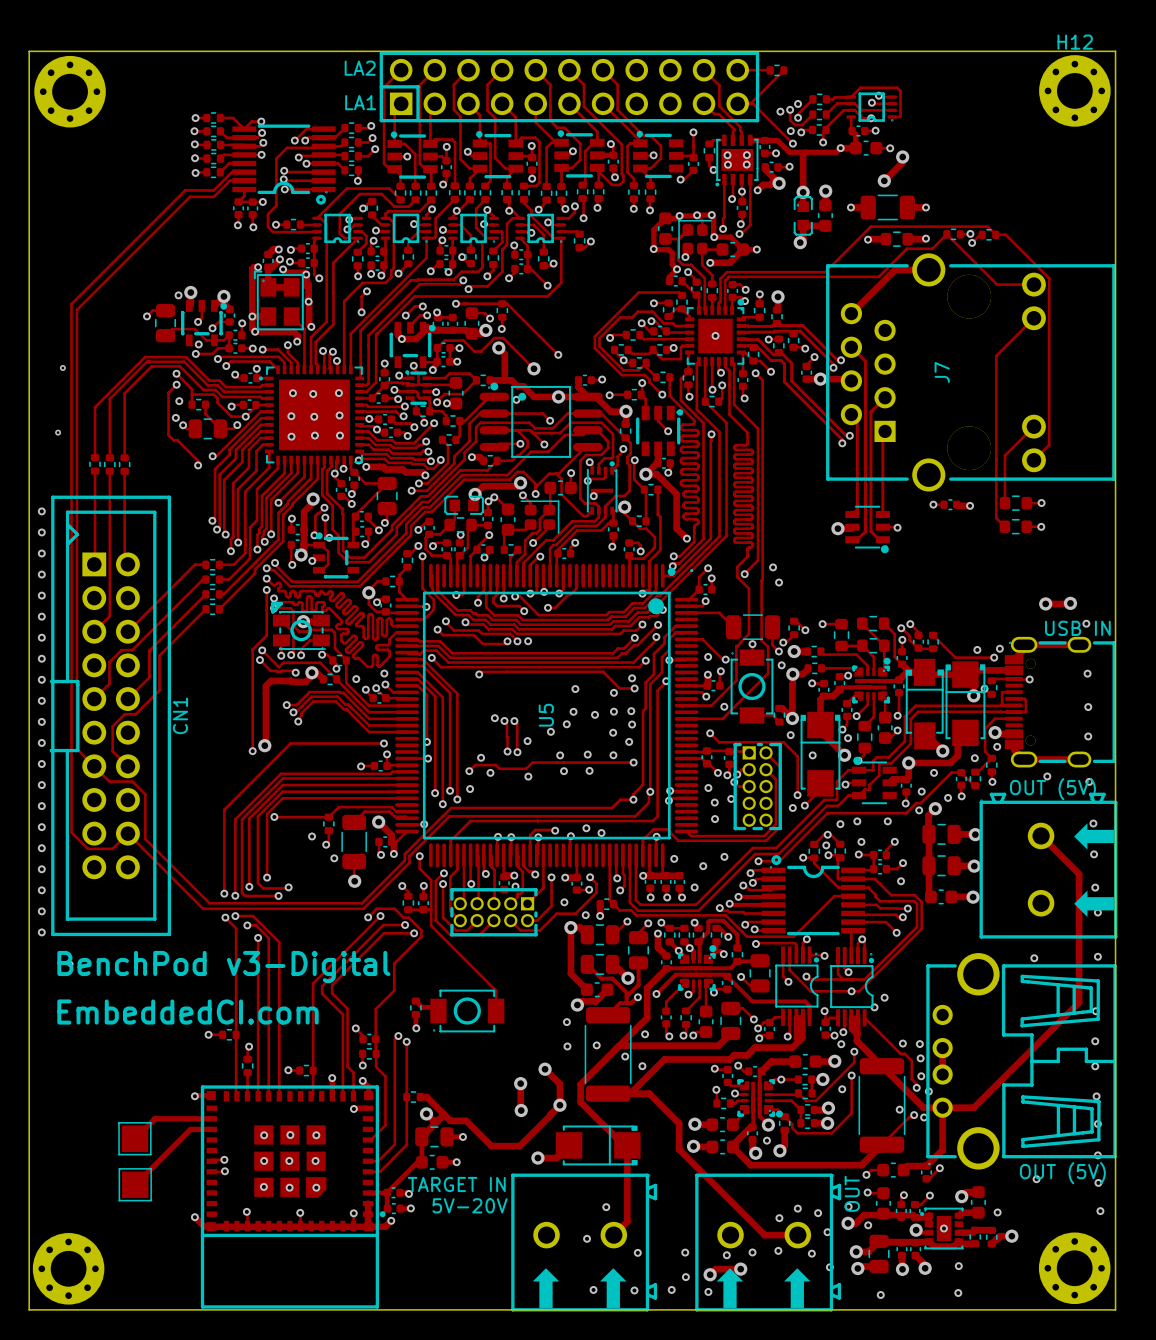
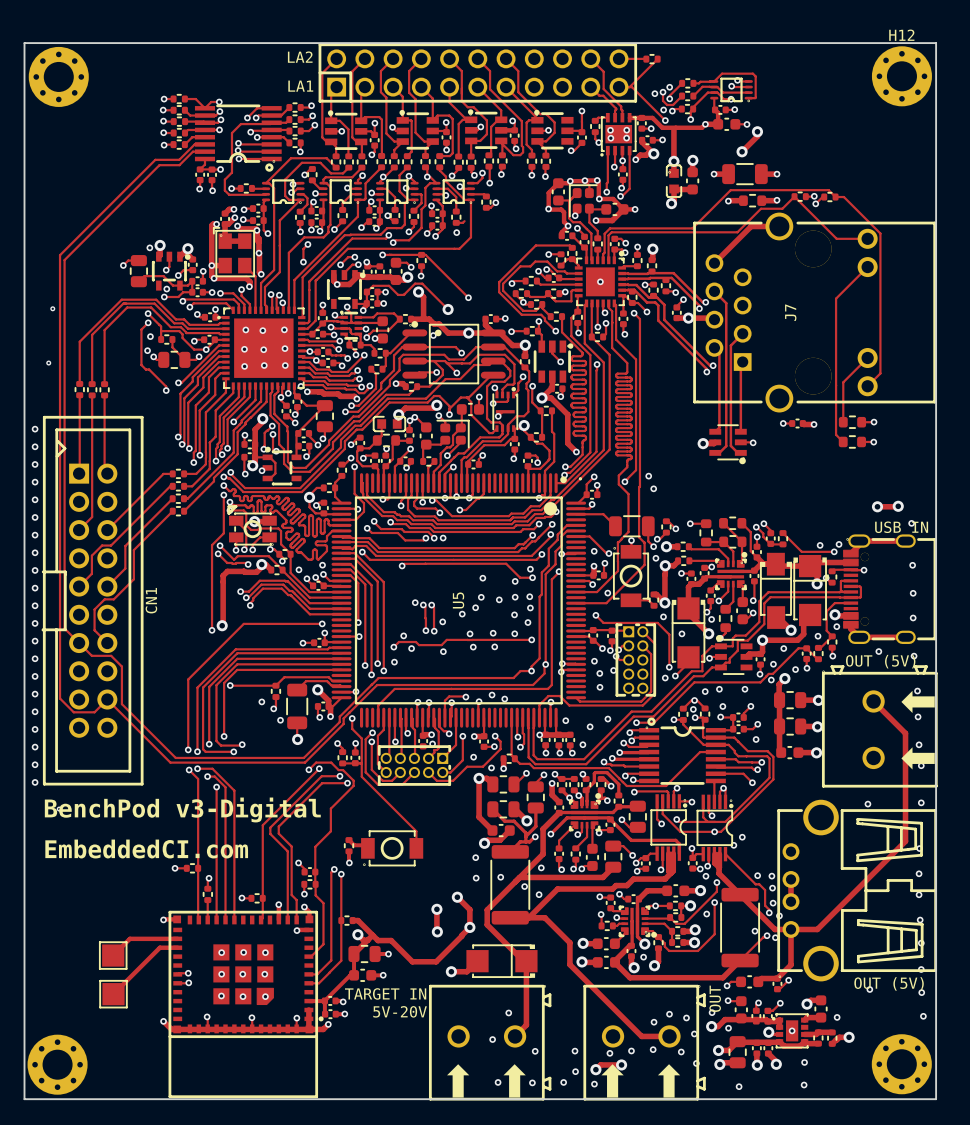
via: (553, 263) -> none
track: (527, 268) (530, 268) (547, 285) -> (442, 225) (442, 229) (435, 236)
via: none -> (456, 232)
via: none -> (435, 236)
via: (547, 285) -> none

